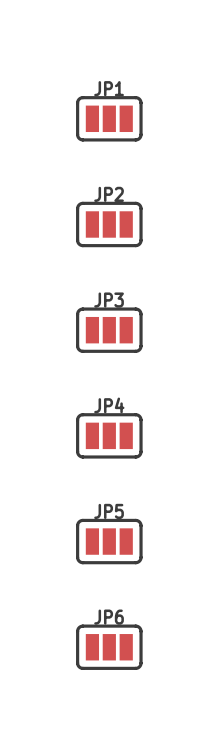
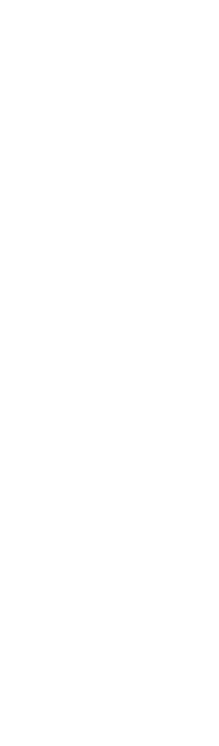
JP1: (109, 118) -> none
JP2: (109, 224) -> none
JP3: (109, 330) -> none
JP4: (109, 435) -> none
JP5: (109, 541) -> none
JP6: (109, 647) -> none

